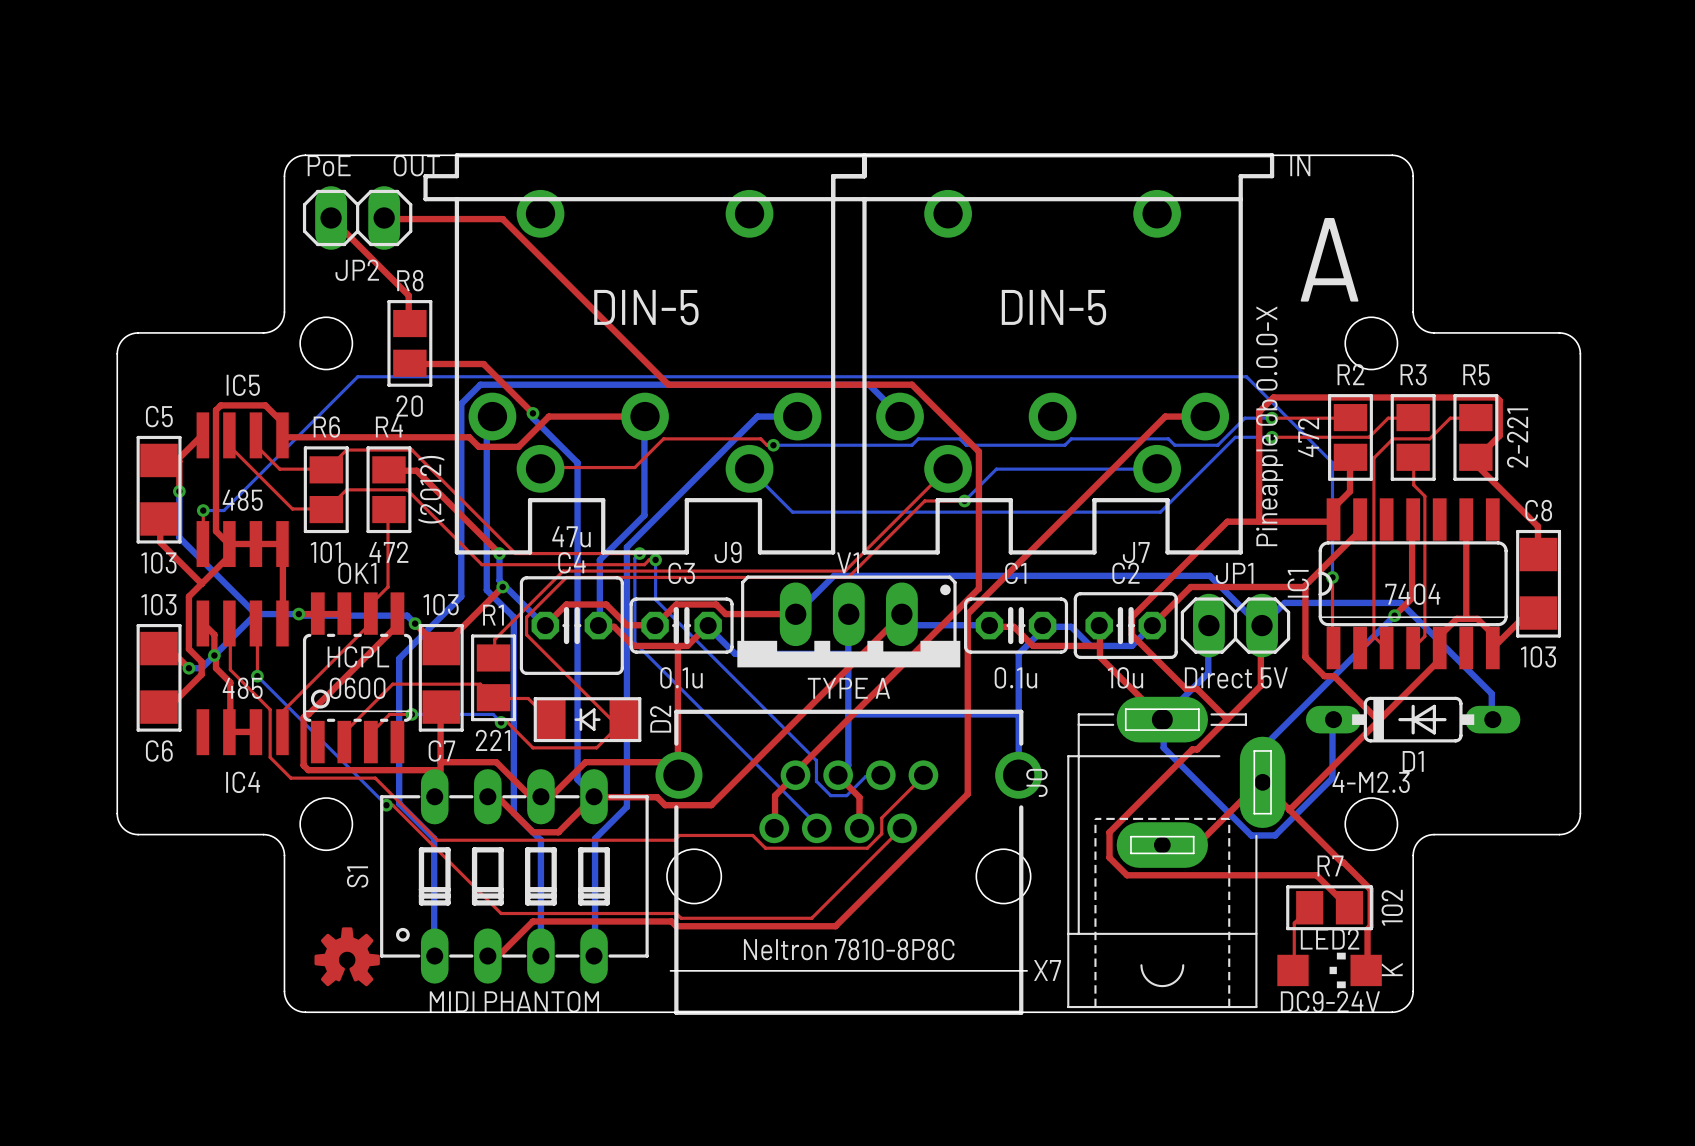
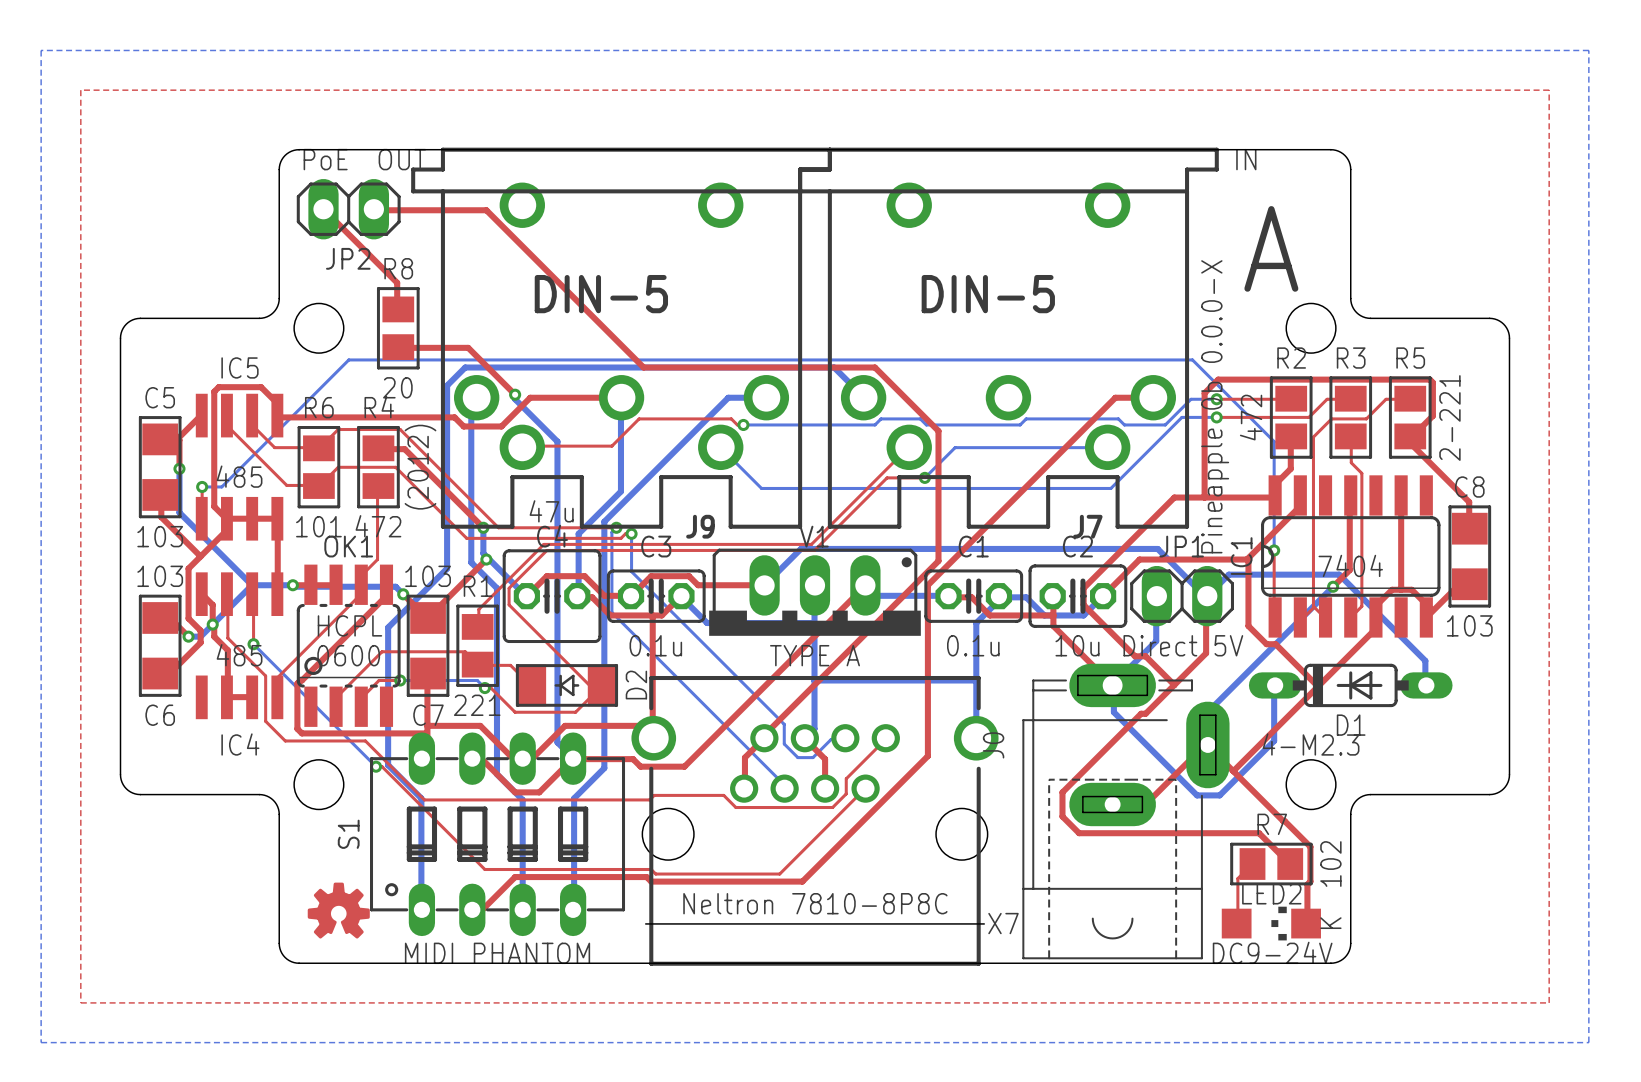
bottom zone outline: none -> (41, 50) (1588, 50) (1588, 1042) (41, 1042) (41, 50)
top zone outline: none -> (80, 90) (1549, 90) (1549, 1002) (80, 1002) (80, 90)

